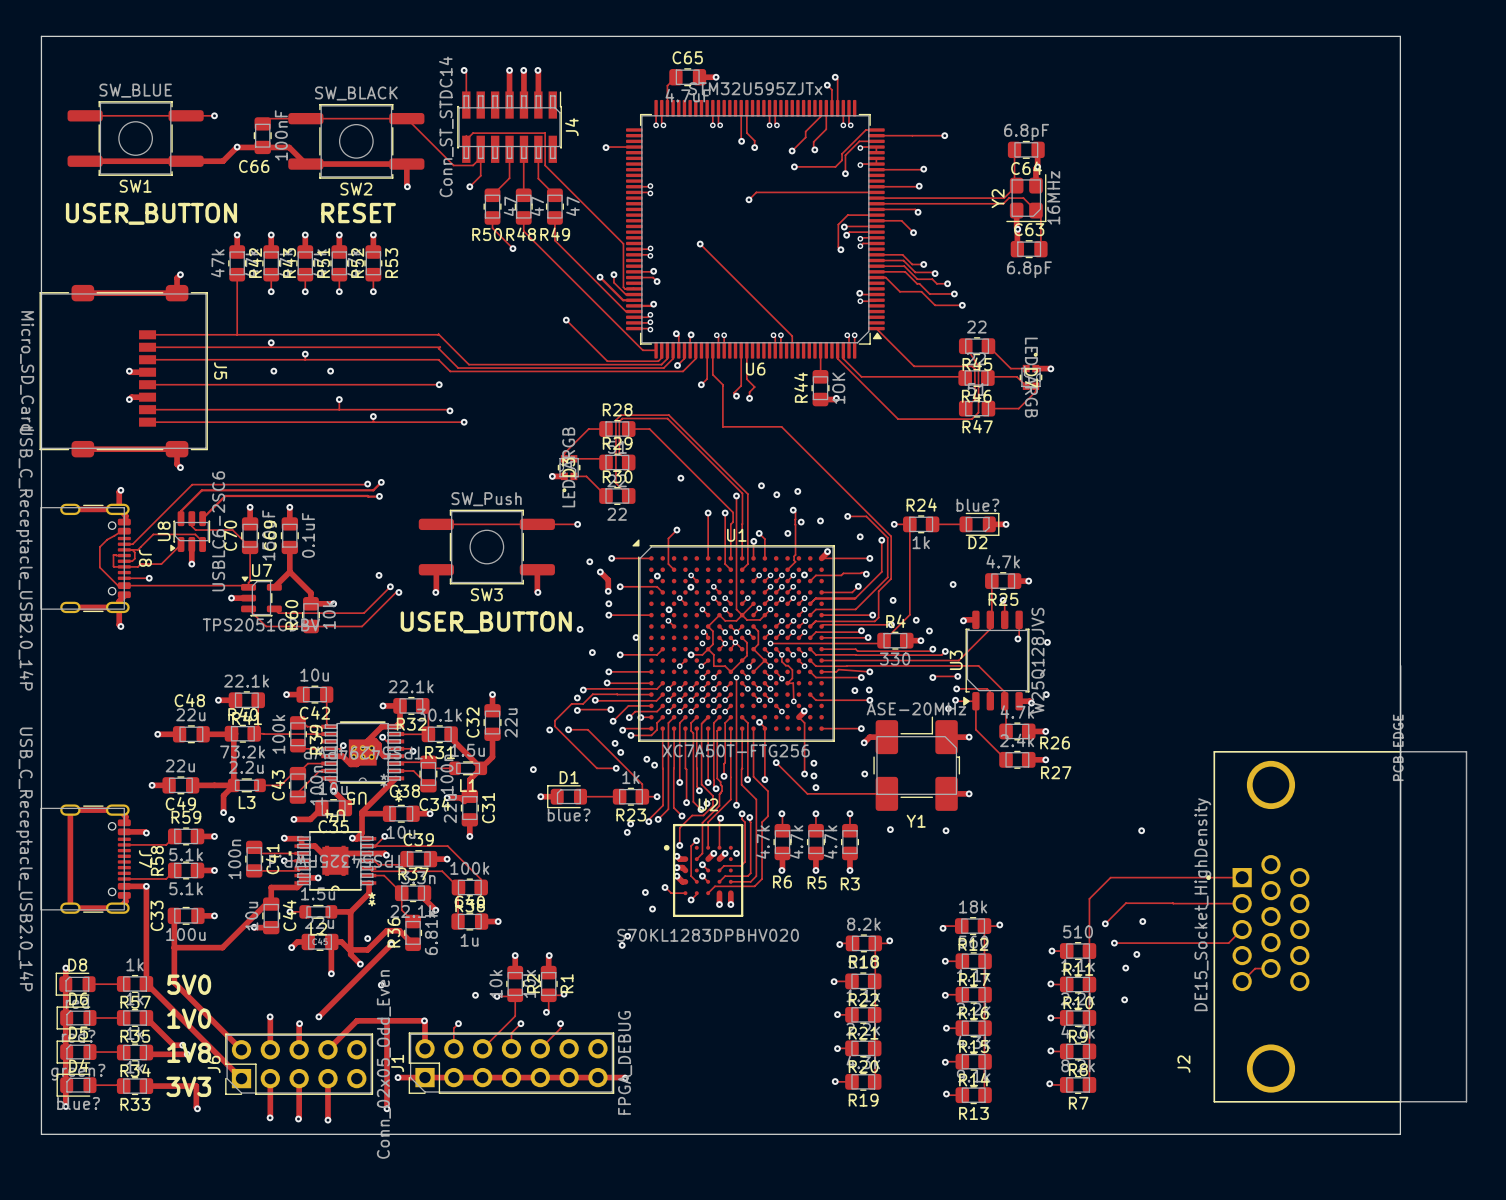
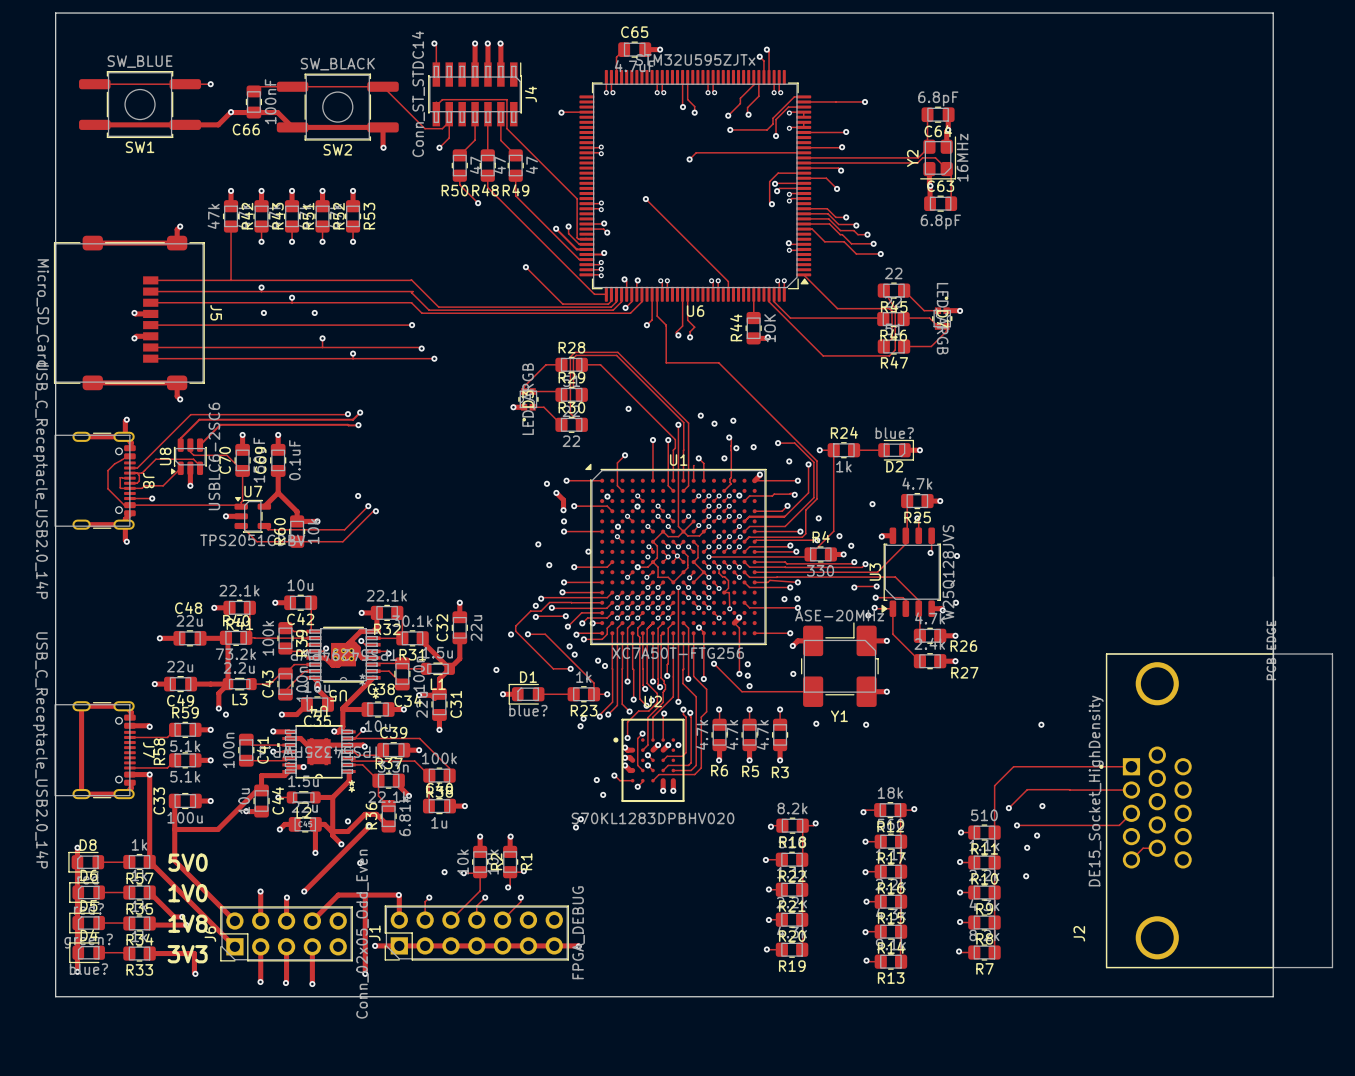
text: USER_BUTTON (151, 213) -> none
text: RESET (358, 213) -> none
track: (436, 524) (577, 524) -> none
via: (577, 524) -> none
via: (753, 541) -> none
SW3: SW_Push (486, 547) -> none
track: (436, 569) (435, 592) -> none
track: (537, 569) (537, 592) -> none
via: (435, 592) -> none
via: (537, 592) -> none
text: USER_BUTTON (486, 622) -> none

